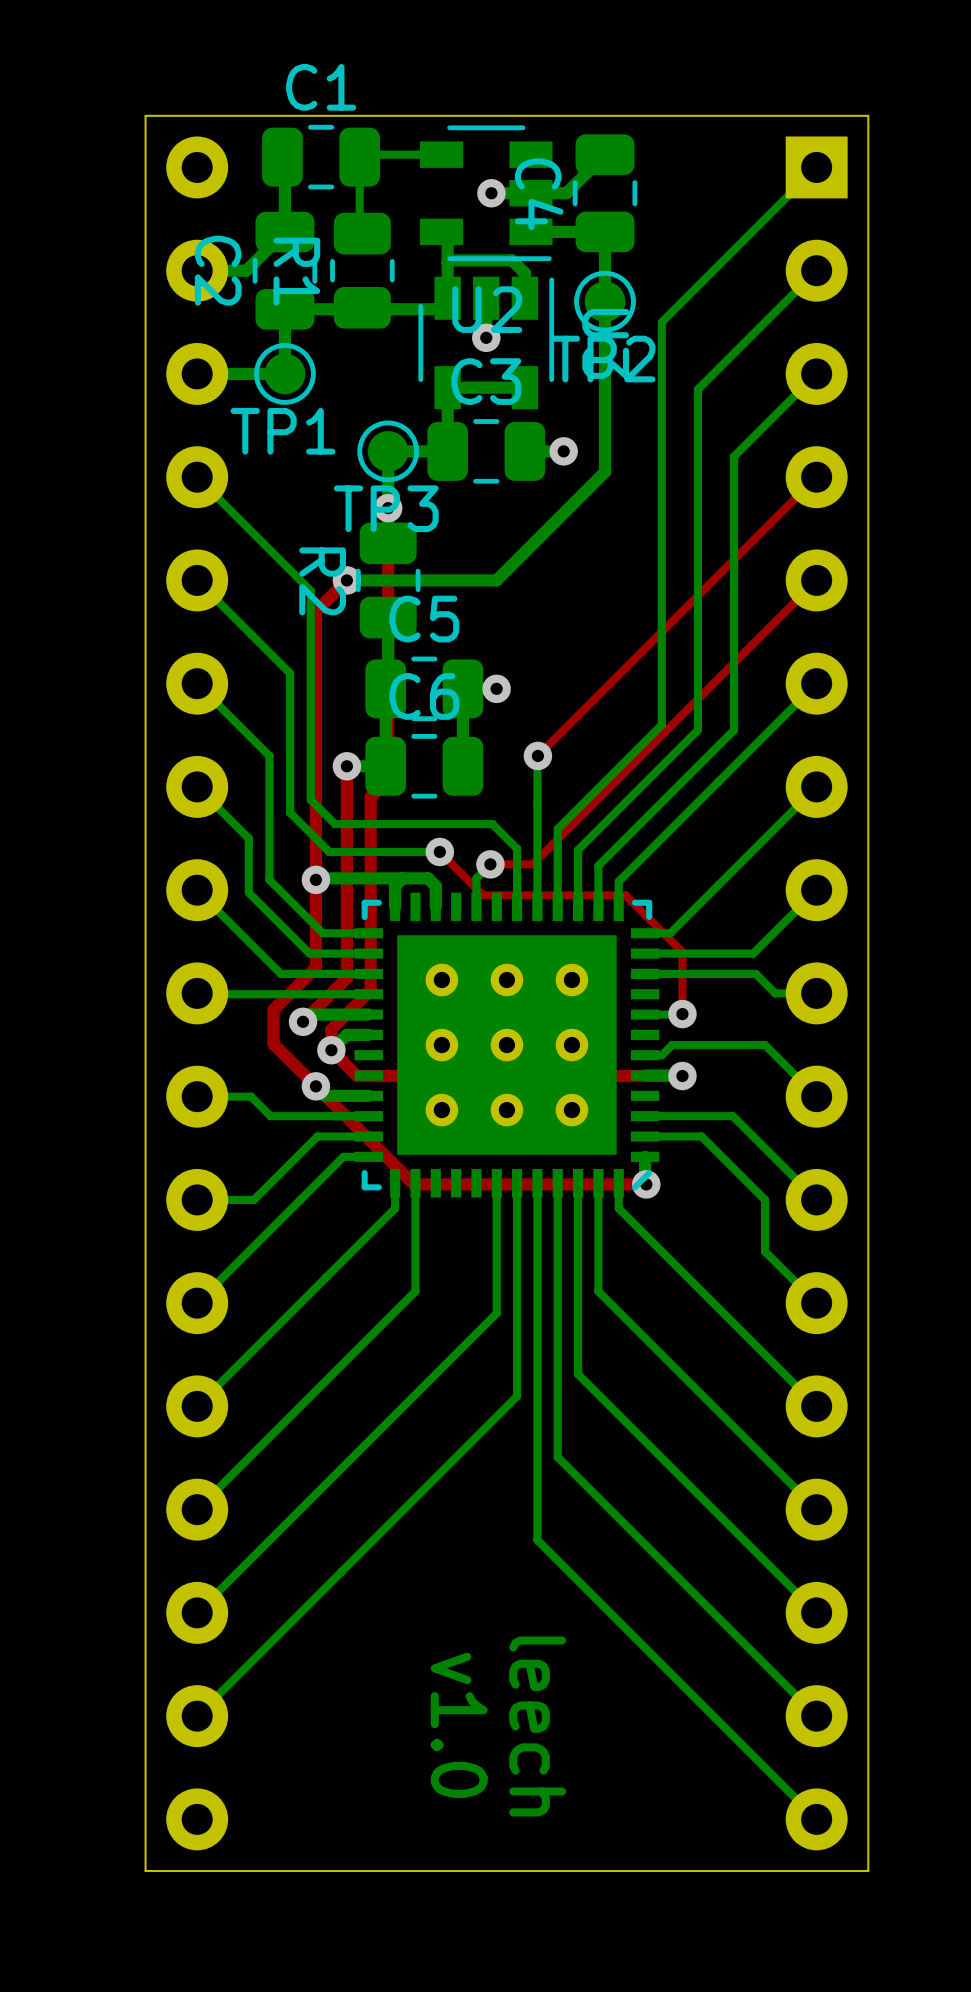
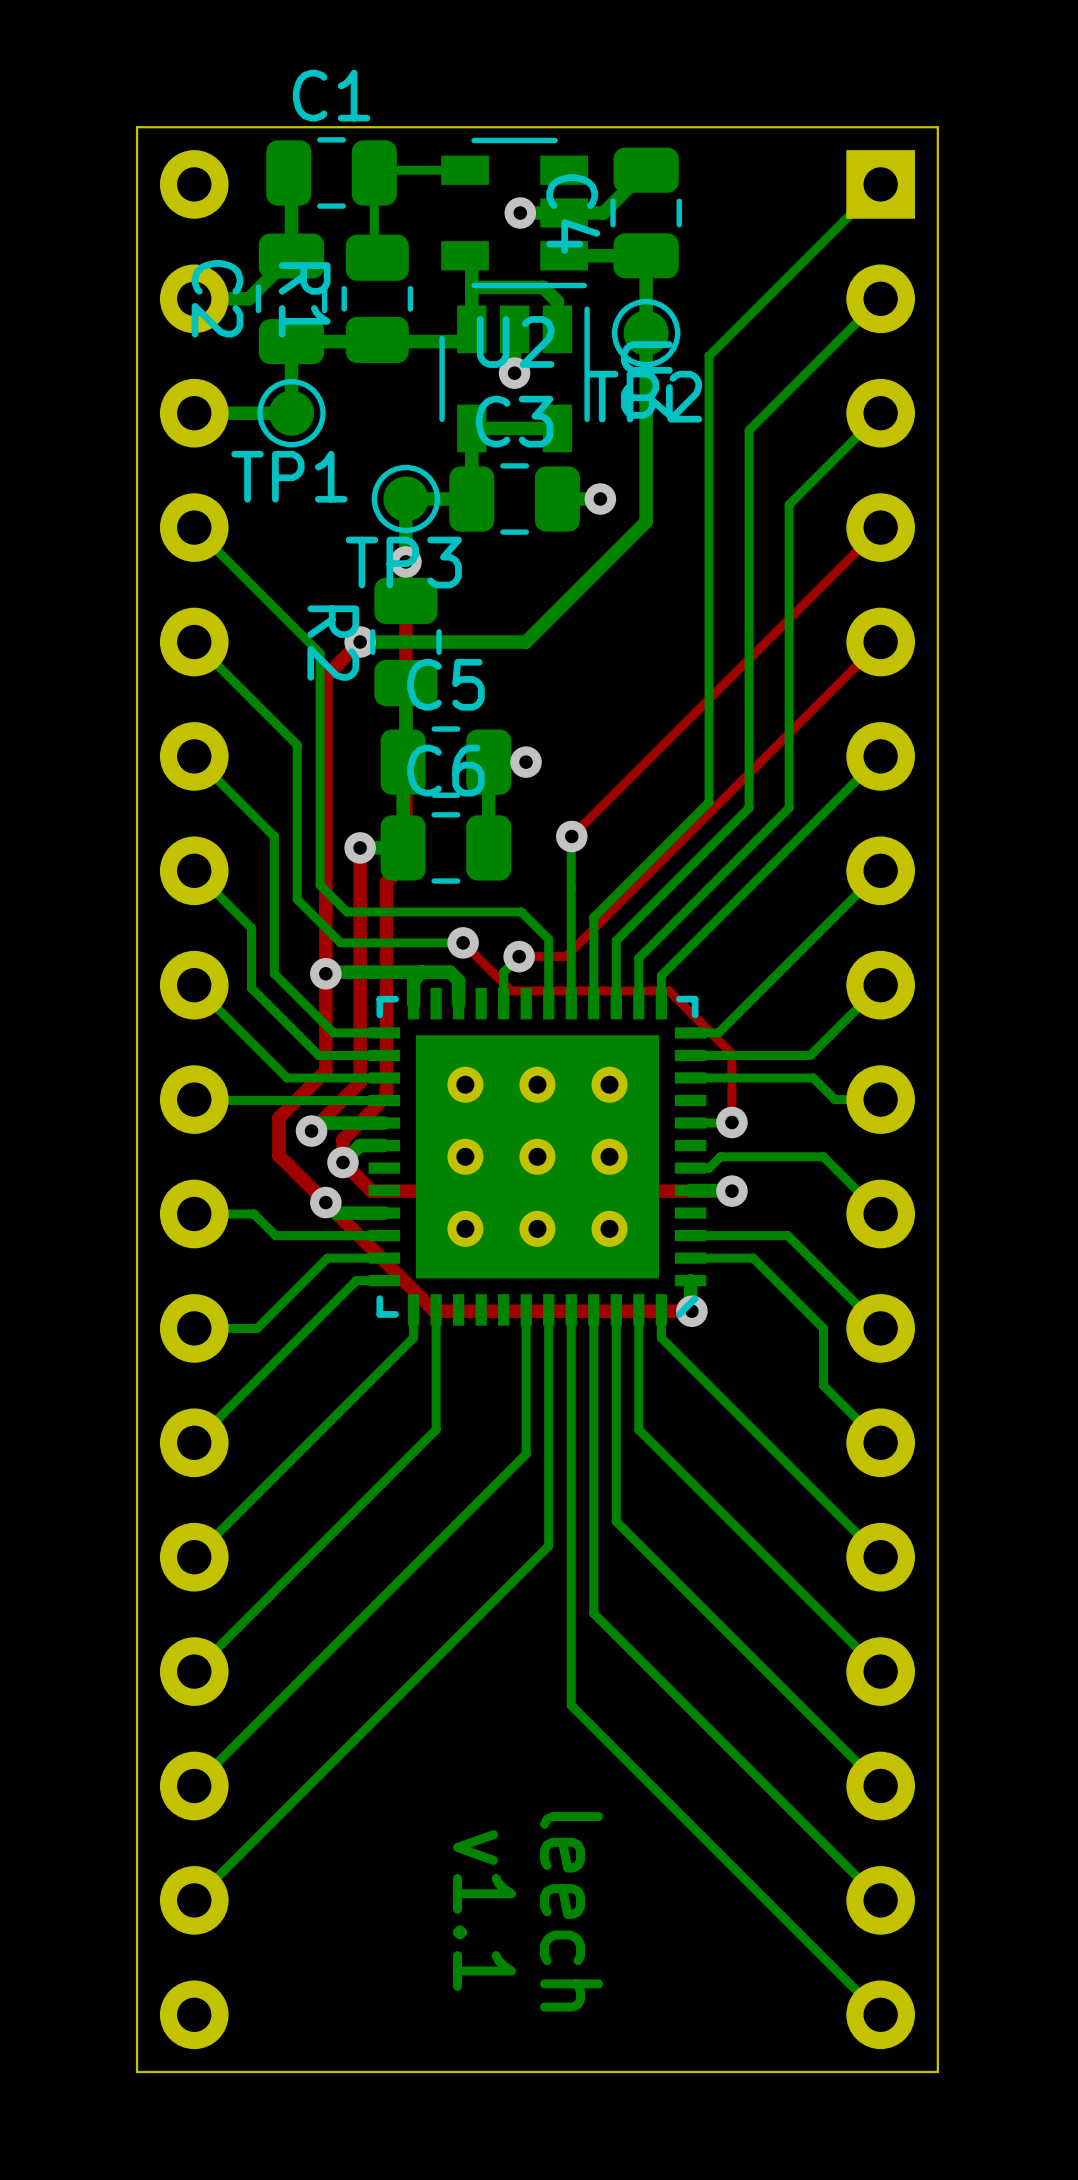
text: v1.0 (459, 1725) -> v1.1 (484, 1910)

